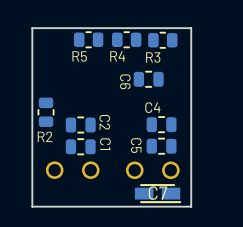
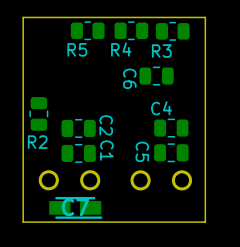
C7 position: (158, 193) -> (75, 207)

